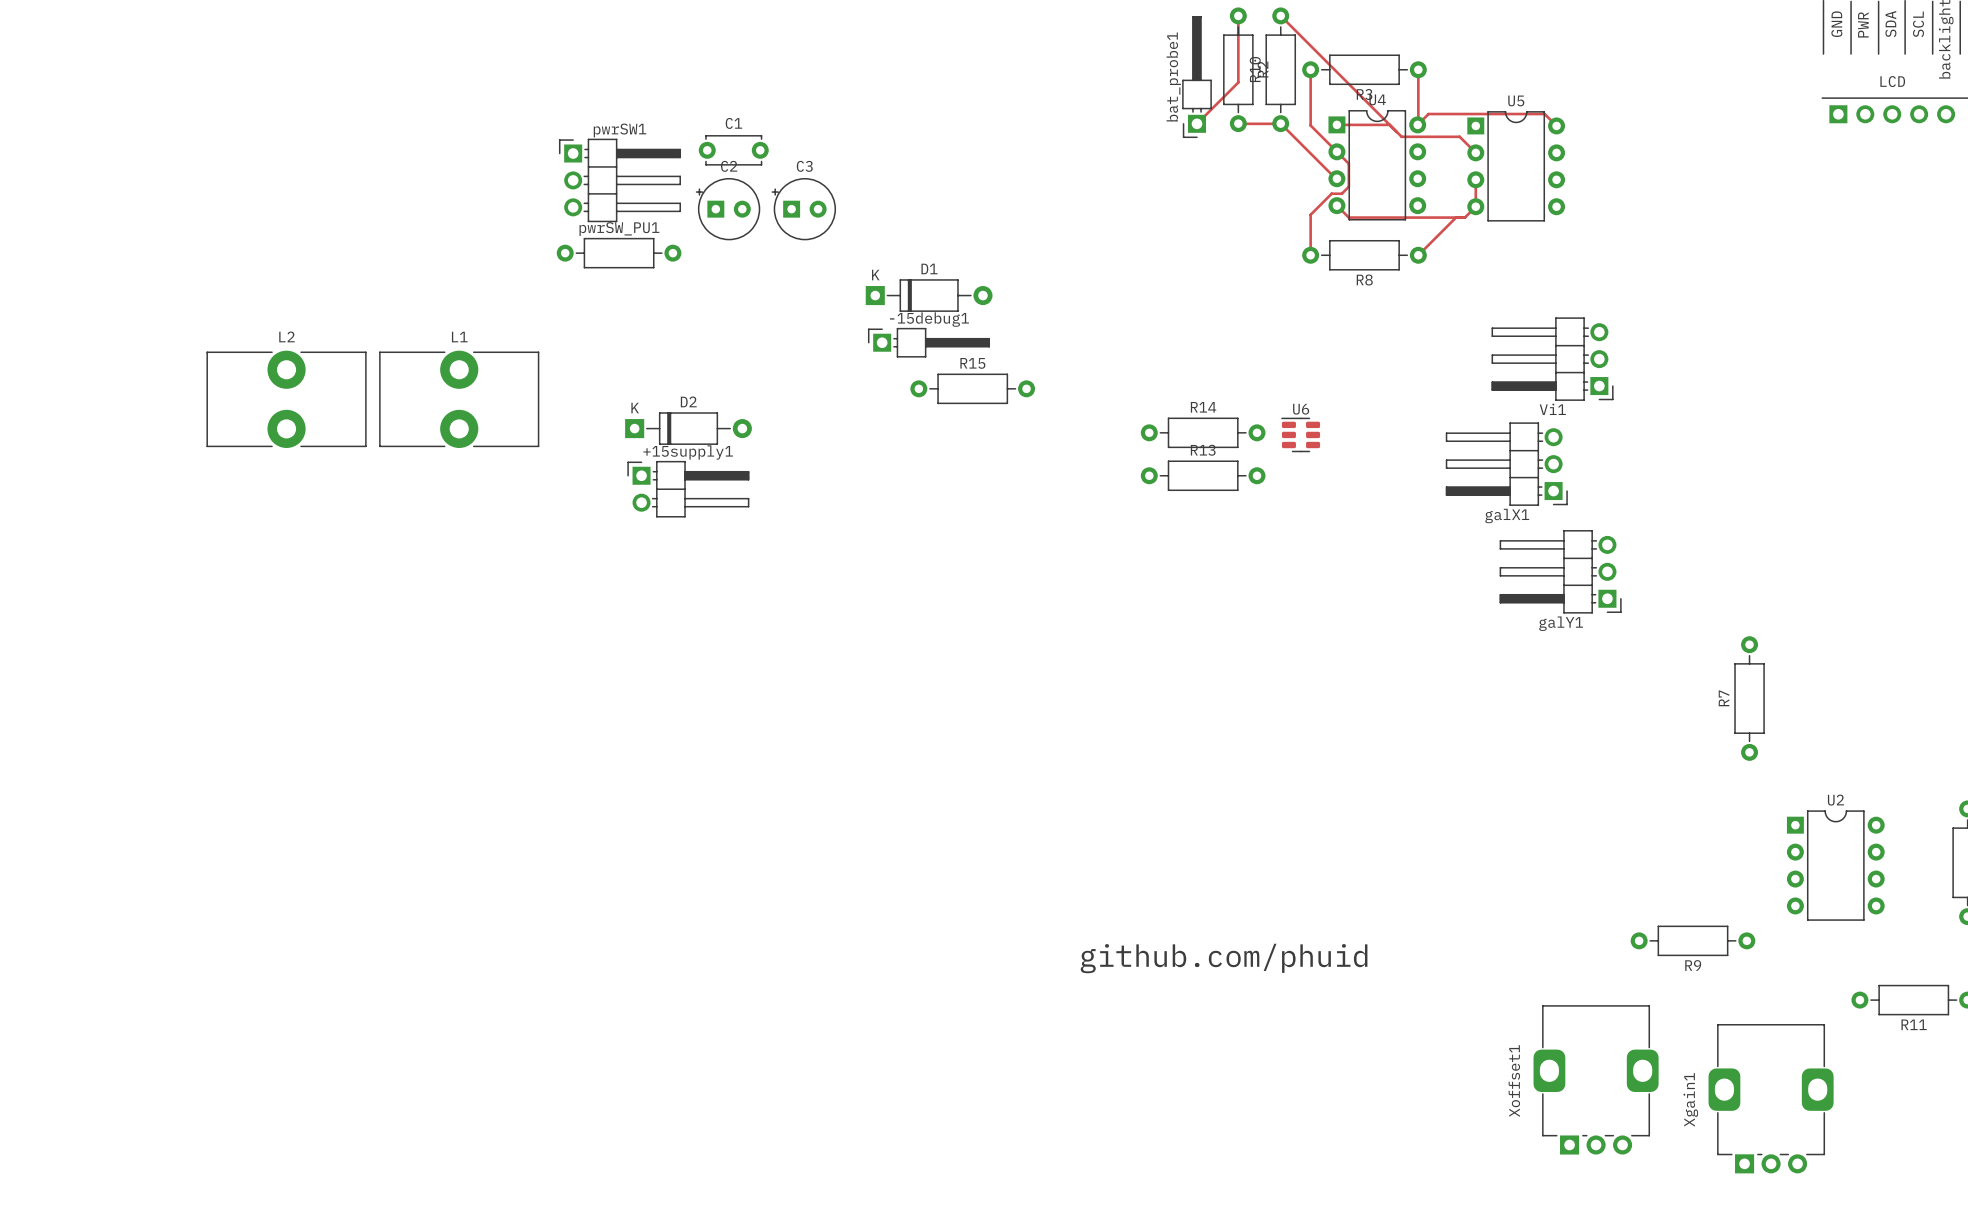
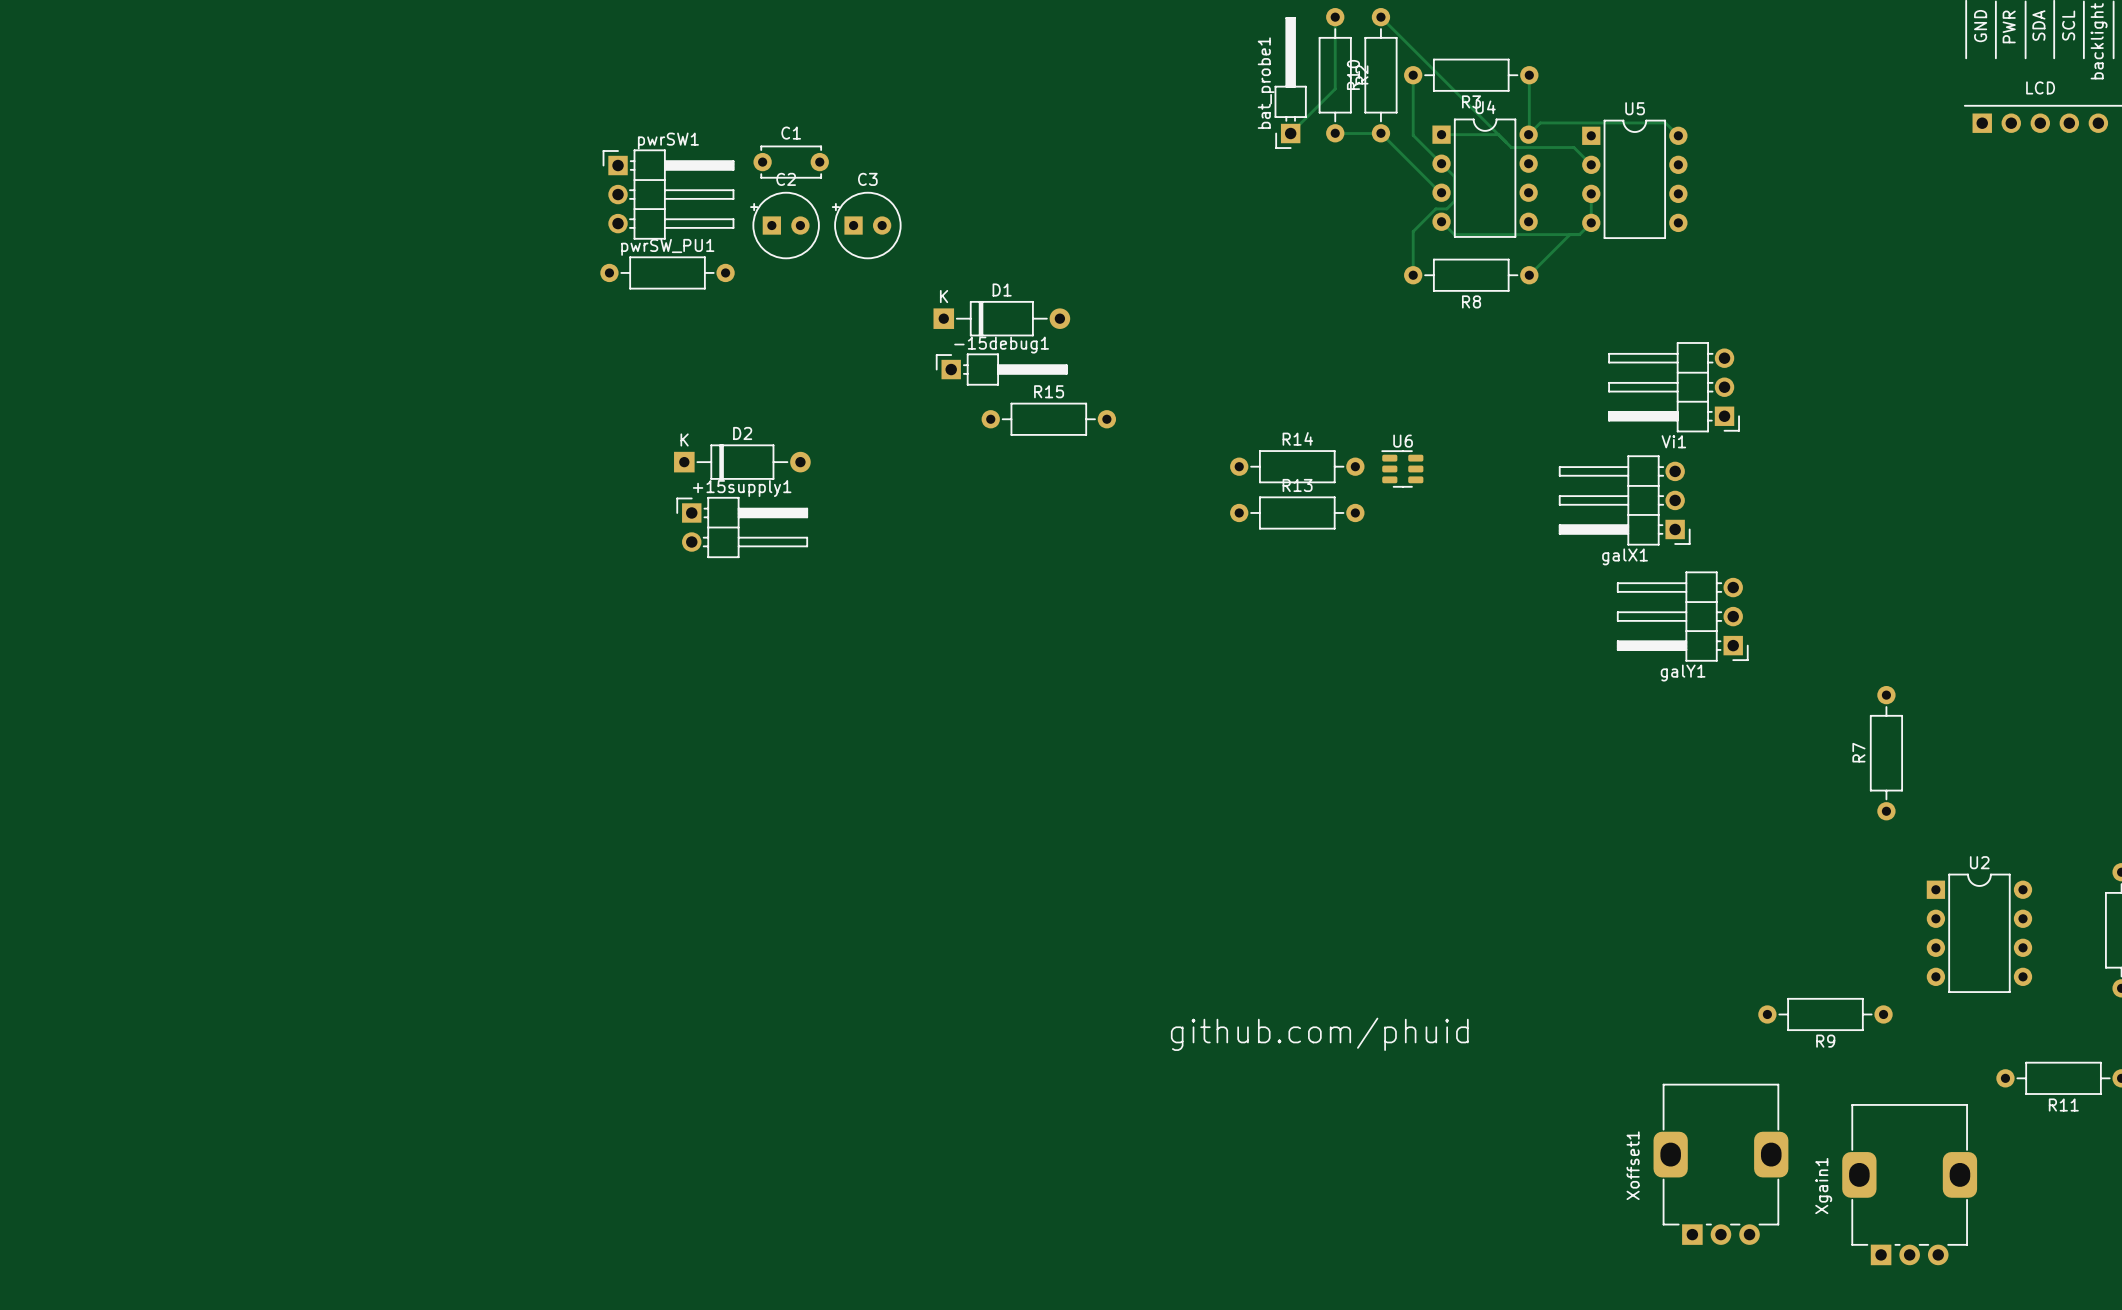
L2: (286, 399) -> none
L1: (459, 399) -> none

